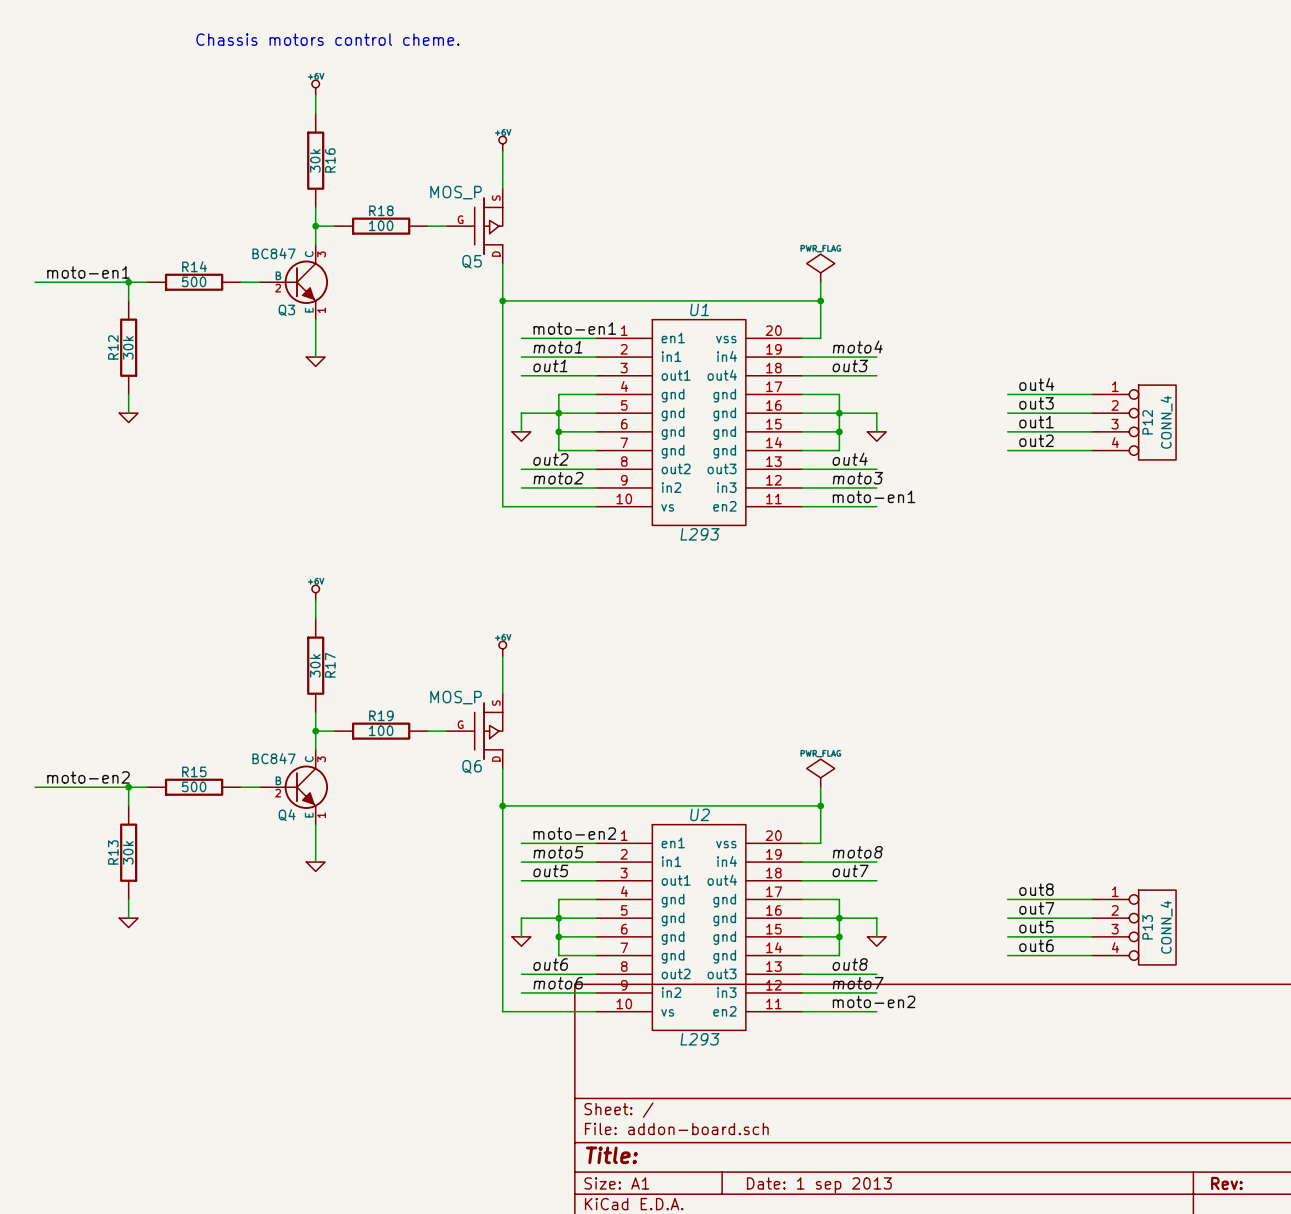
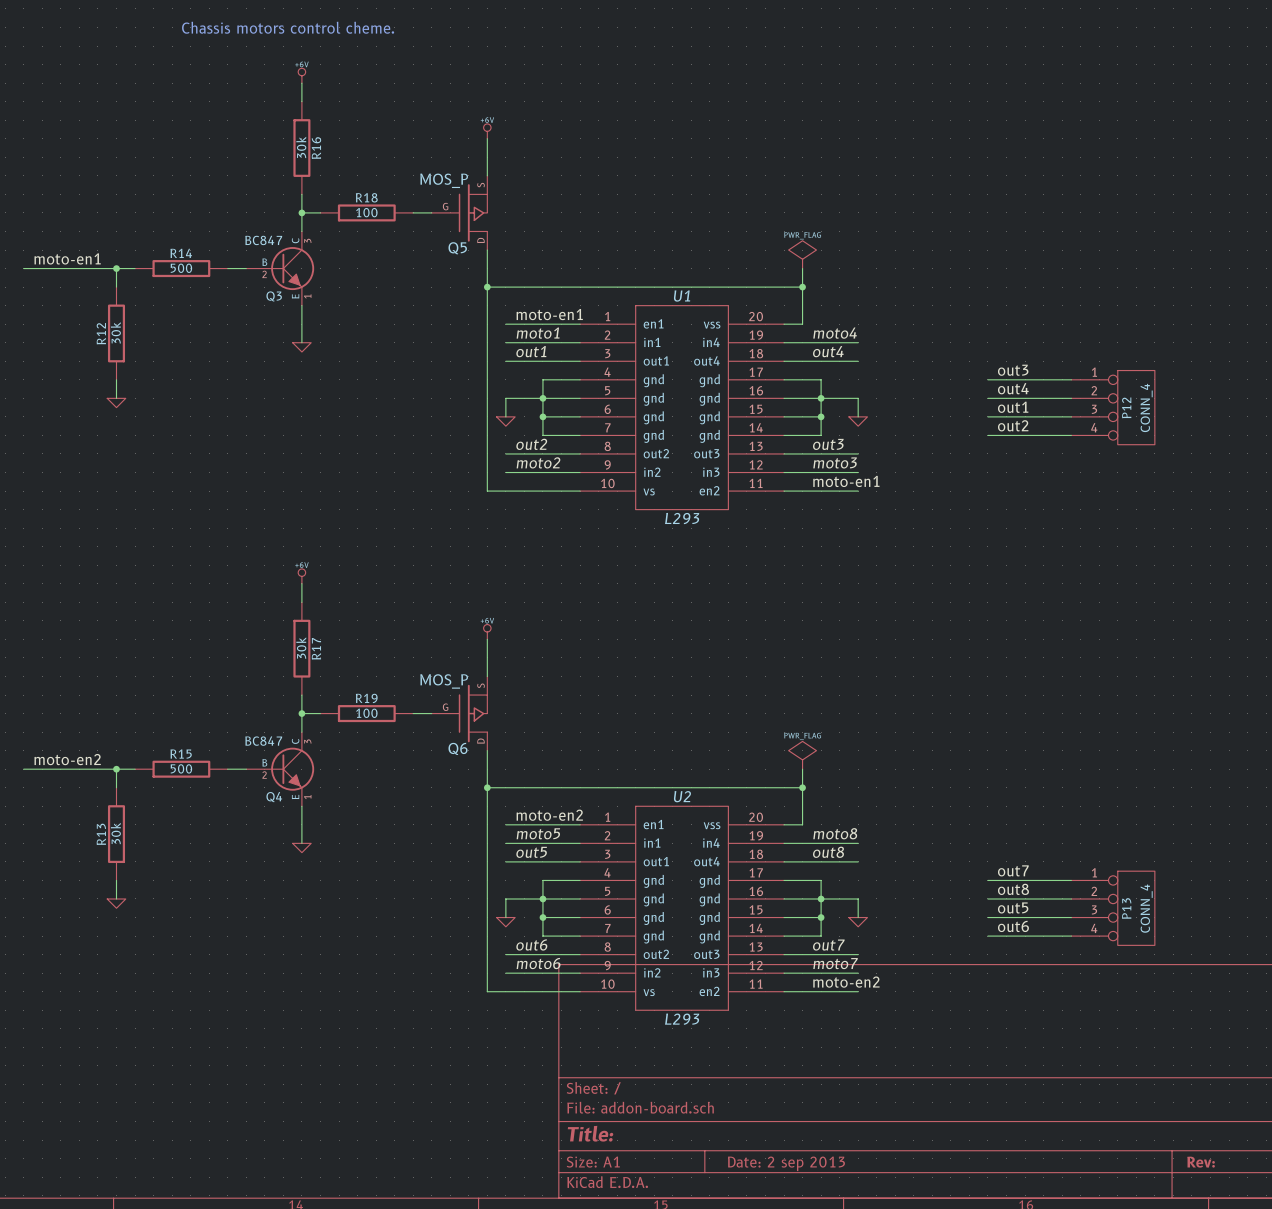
label: out3 (850, 365) -> out4 (828, 351)
label: out4 (1036, 384) -> out3 (1013, 370)
label: out3 (1036, 403) -> out4 (1013, 388)
label: out4 (850, 459) -> out3 (828, 444)
label: out7 (850, 870) -> out8 (828, 852)
label: out8 (1036, 889) -> out7 (1013, 870)
label: out7 (1036, 908) -> out8 (1013, 889)
label: out8 (850, 964) -> out7 (828, 945)
title block: Date: 1 sep 2013 (819, 1185) -> Date: 2 sep 2013 (786, 1163)

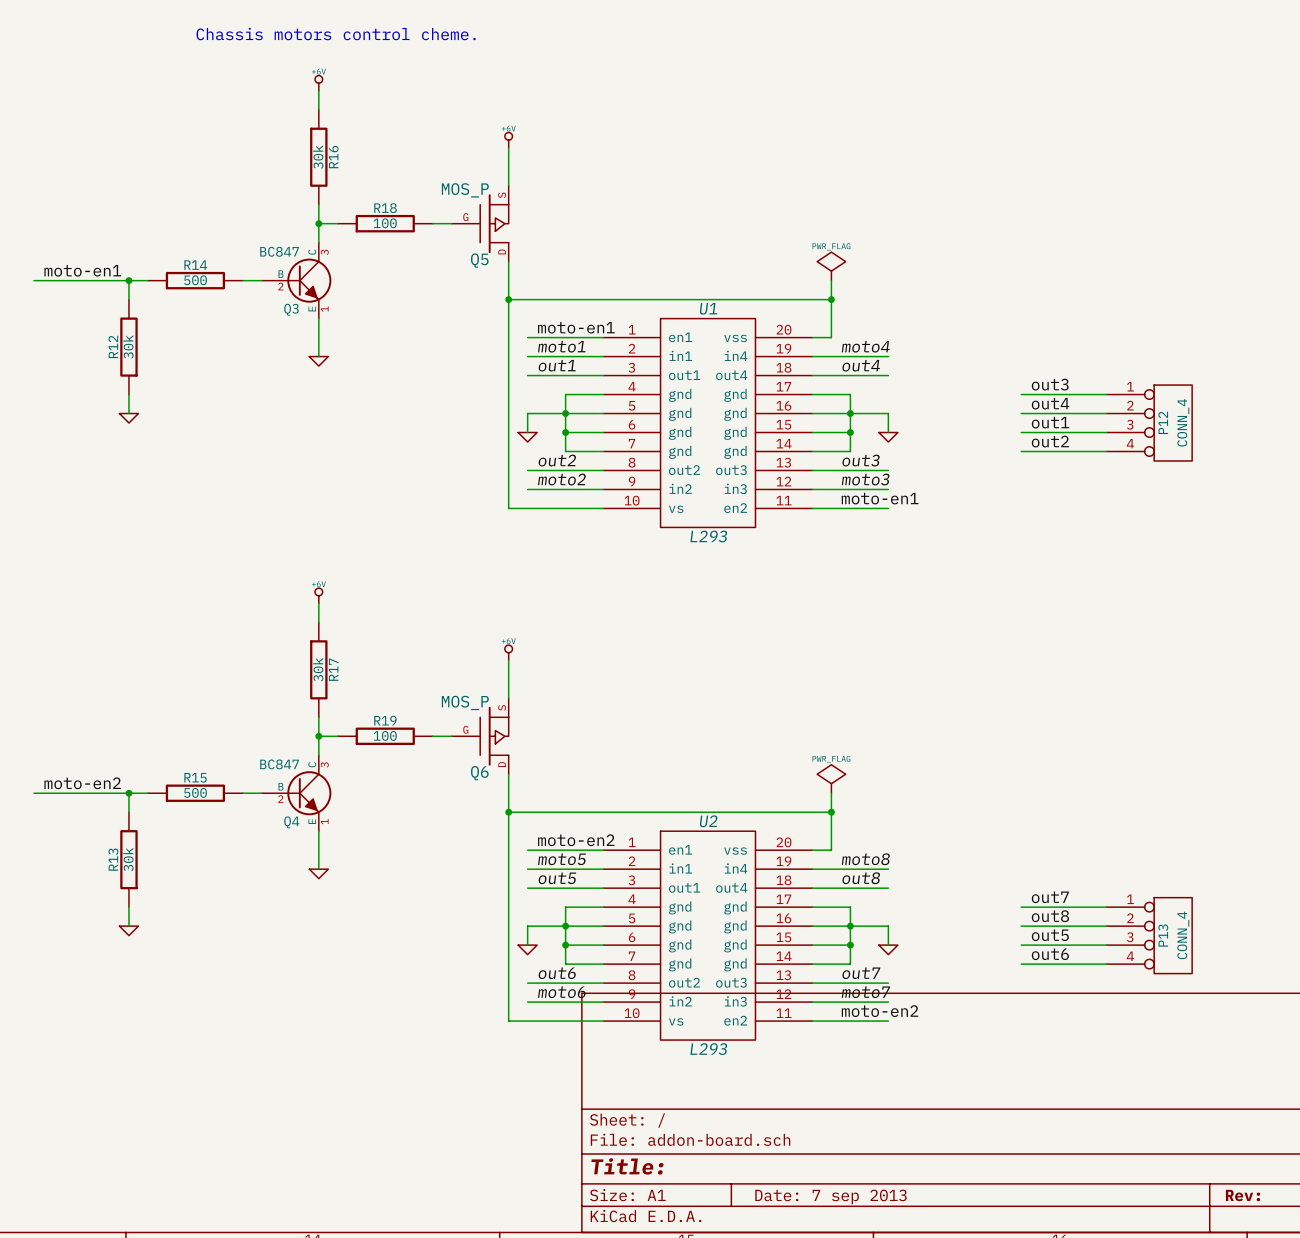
title block: Date: 2 sep 2013 (786, 1163) -> Date: 7 sep 2013 (830, 1196)

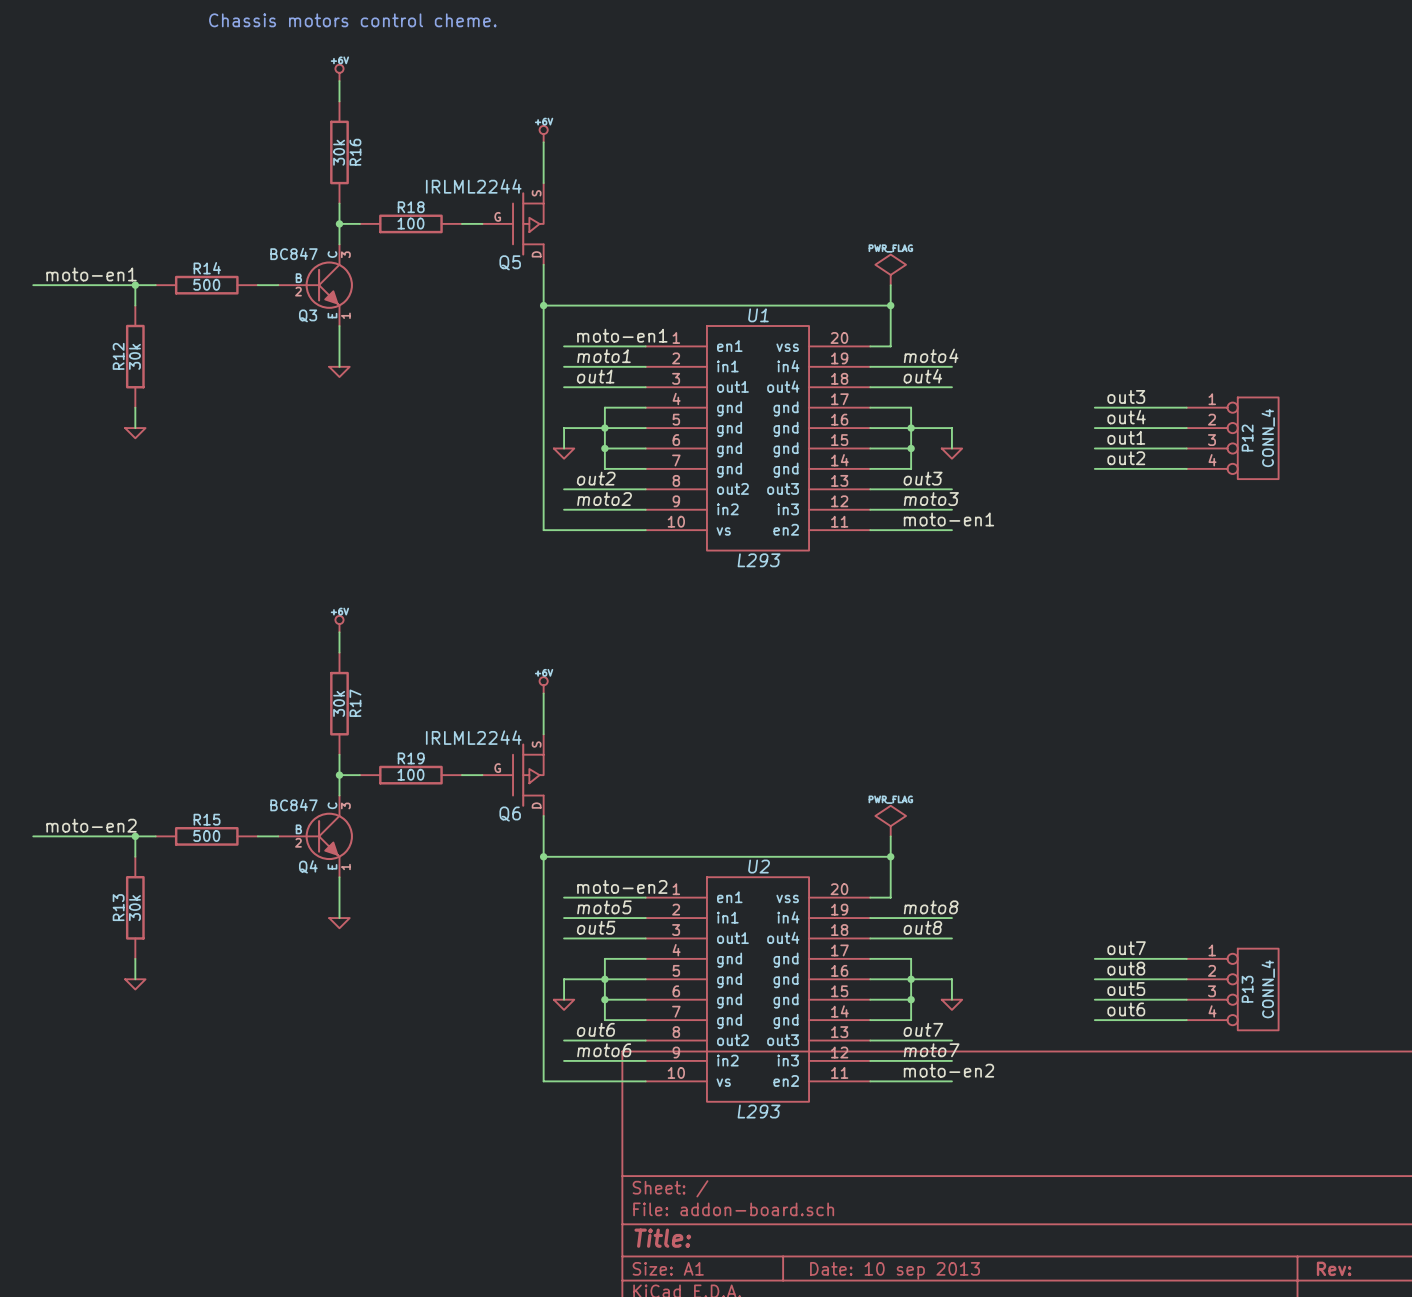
Q5 value: MOS_P (465, 190) -> IRLML2244 (473, 186)
Q6 value: MOS_P (465, 702) -> IRLML2244 (473, 737)
title block: Date: 7 sep 2013 (830, 1196) -> Date: 10 sep 2013 (895, 1270)

